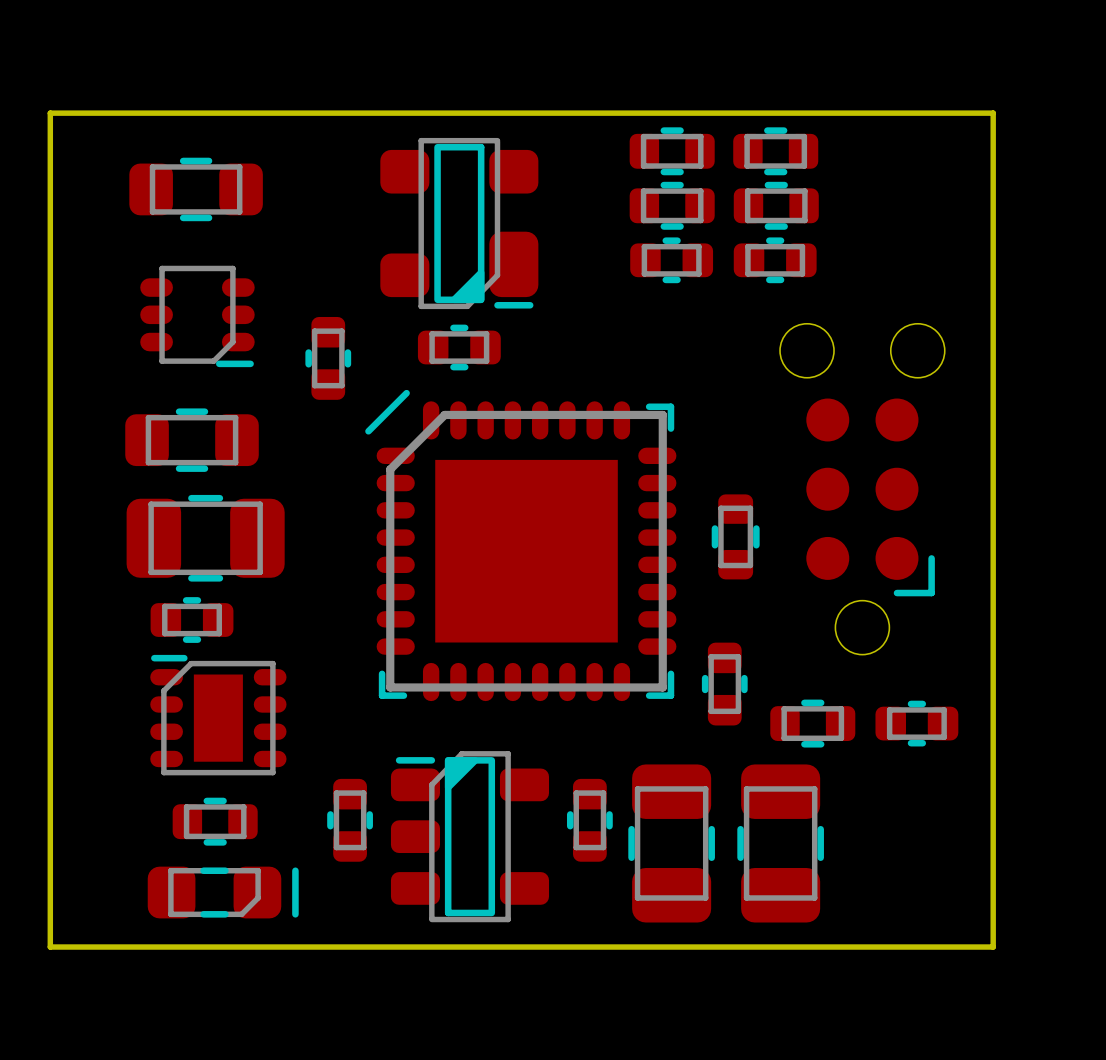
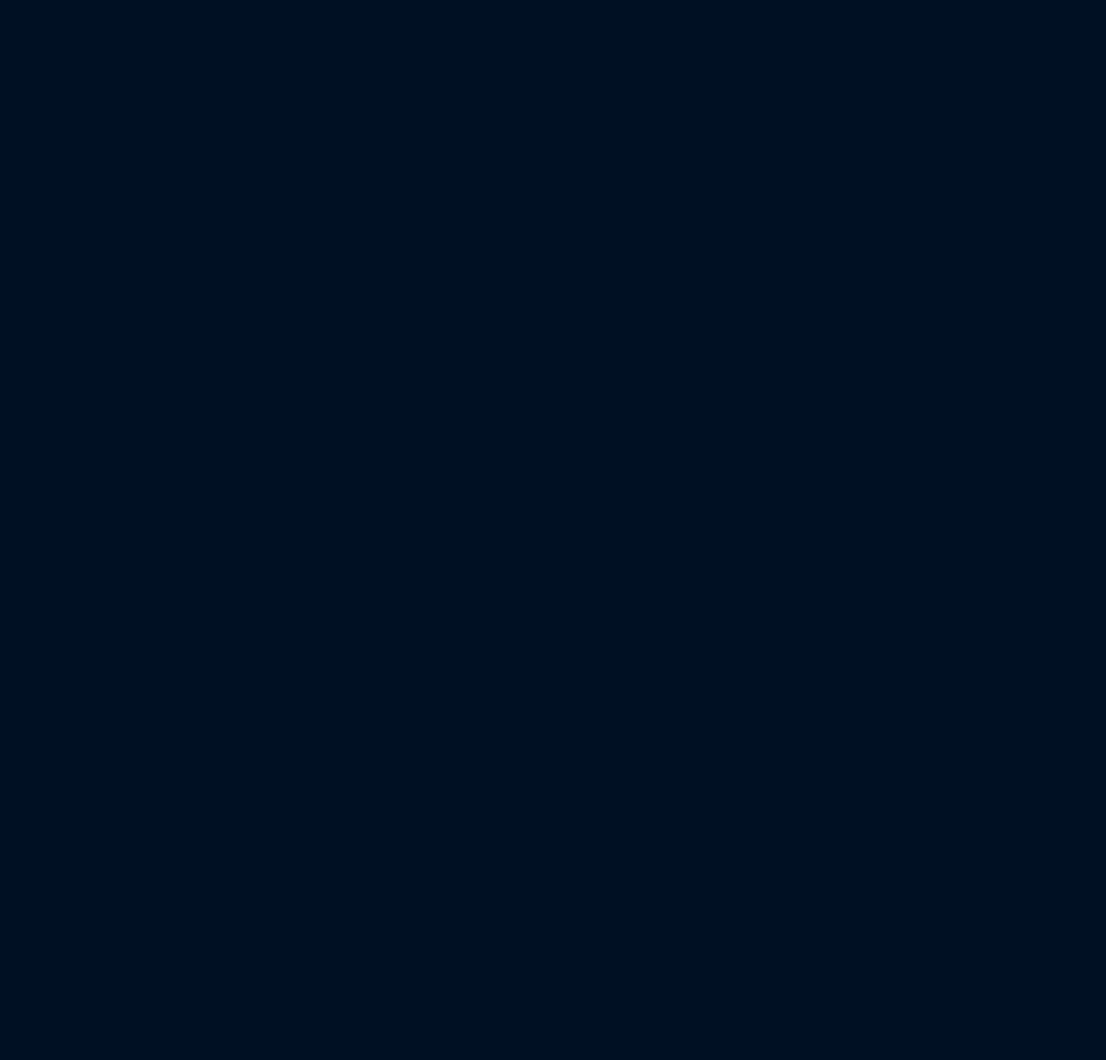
board edge: (50, 113) (993, 113) (993, 947) (50, 947) (50, 113) -> none
part: (672, 151) -> none
part: (775, 151) -> none
part: (196, 189) -> none
part: (672, 205) -> none
part: (776, 205) -> none
part: (459, 223) -> none
part: (671, 260) -> none
part: (775, 260) -> none
part: (197, 316) -> none
part: (459, 347) -> none
part: (328, 358) -> none
part: (192, 440) -> none
part: (862, 489) -> none
part: (735, 536) -> none
part: (205, 538) -> none
part: (520, 545) -> none
part: (192, 620) -> none
part: (724, 684) -> none
part: (218, 715) -> none
part: (812, 723) -> none
part: (916, 723) -> none
part: (350, 820) -> none
part: (589, 820) -> none
part: (215, 821) -> none
part: (469, 836) -> none
part: (671, 843) -> none
part: (780, 843) -> none
part: (223, 892) -> none

